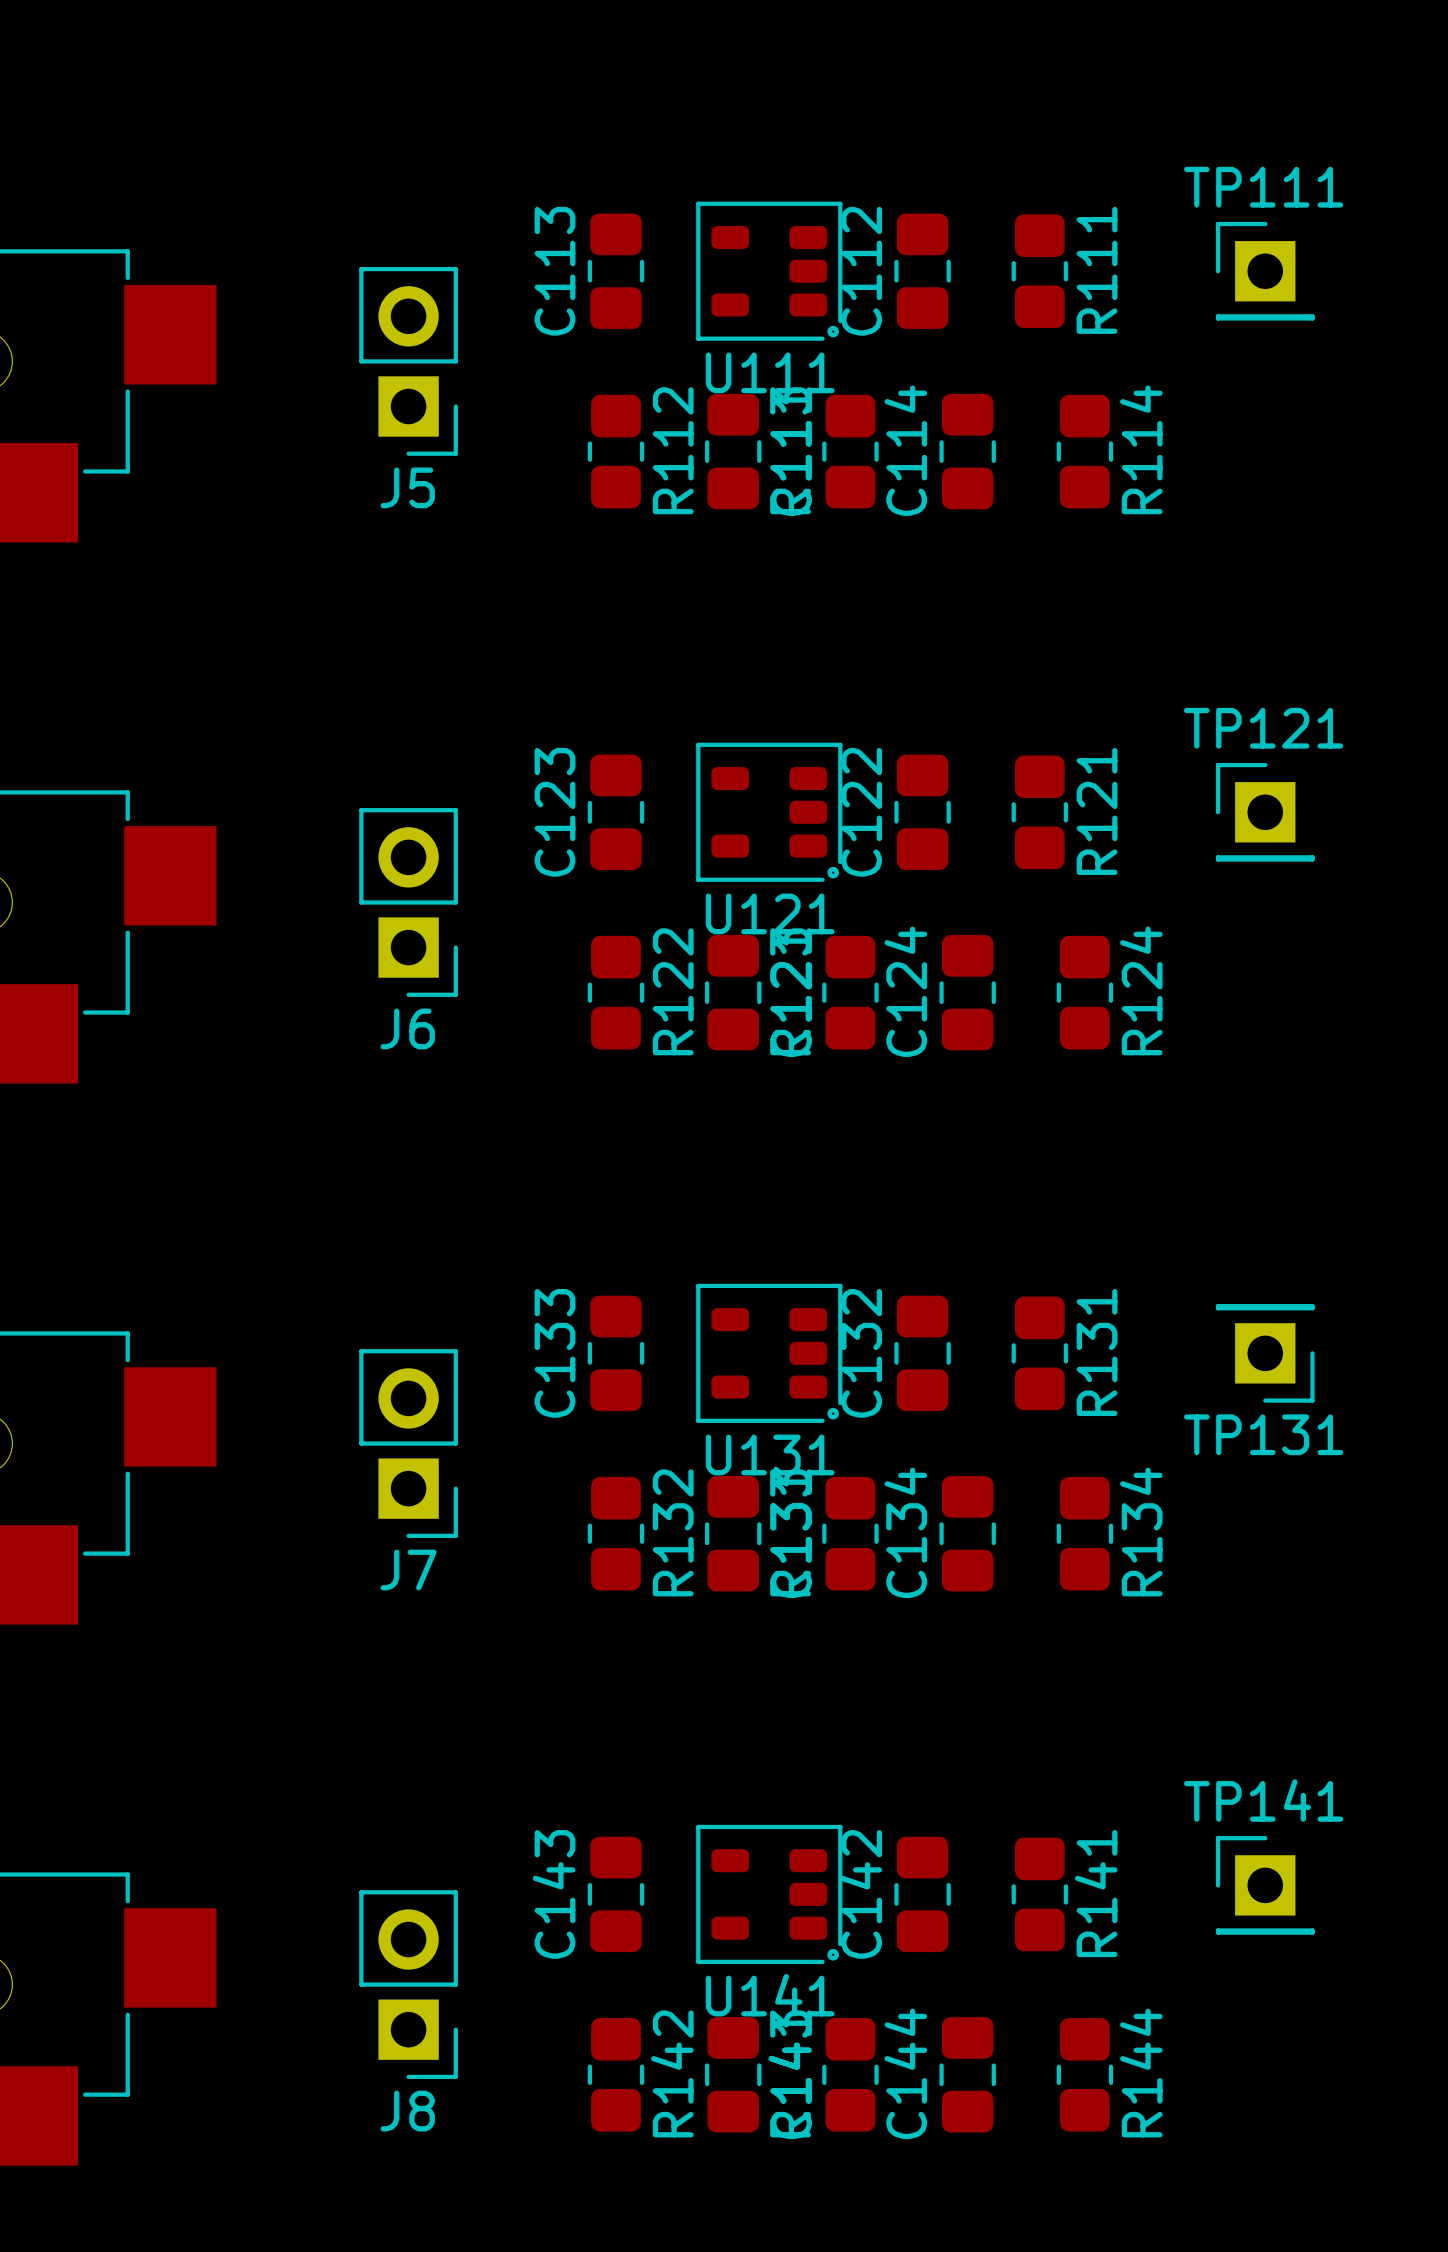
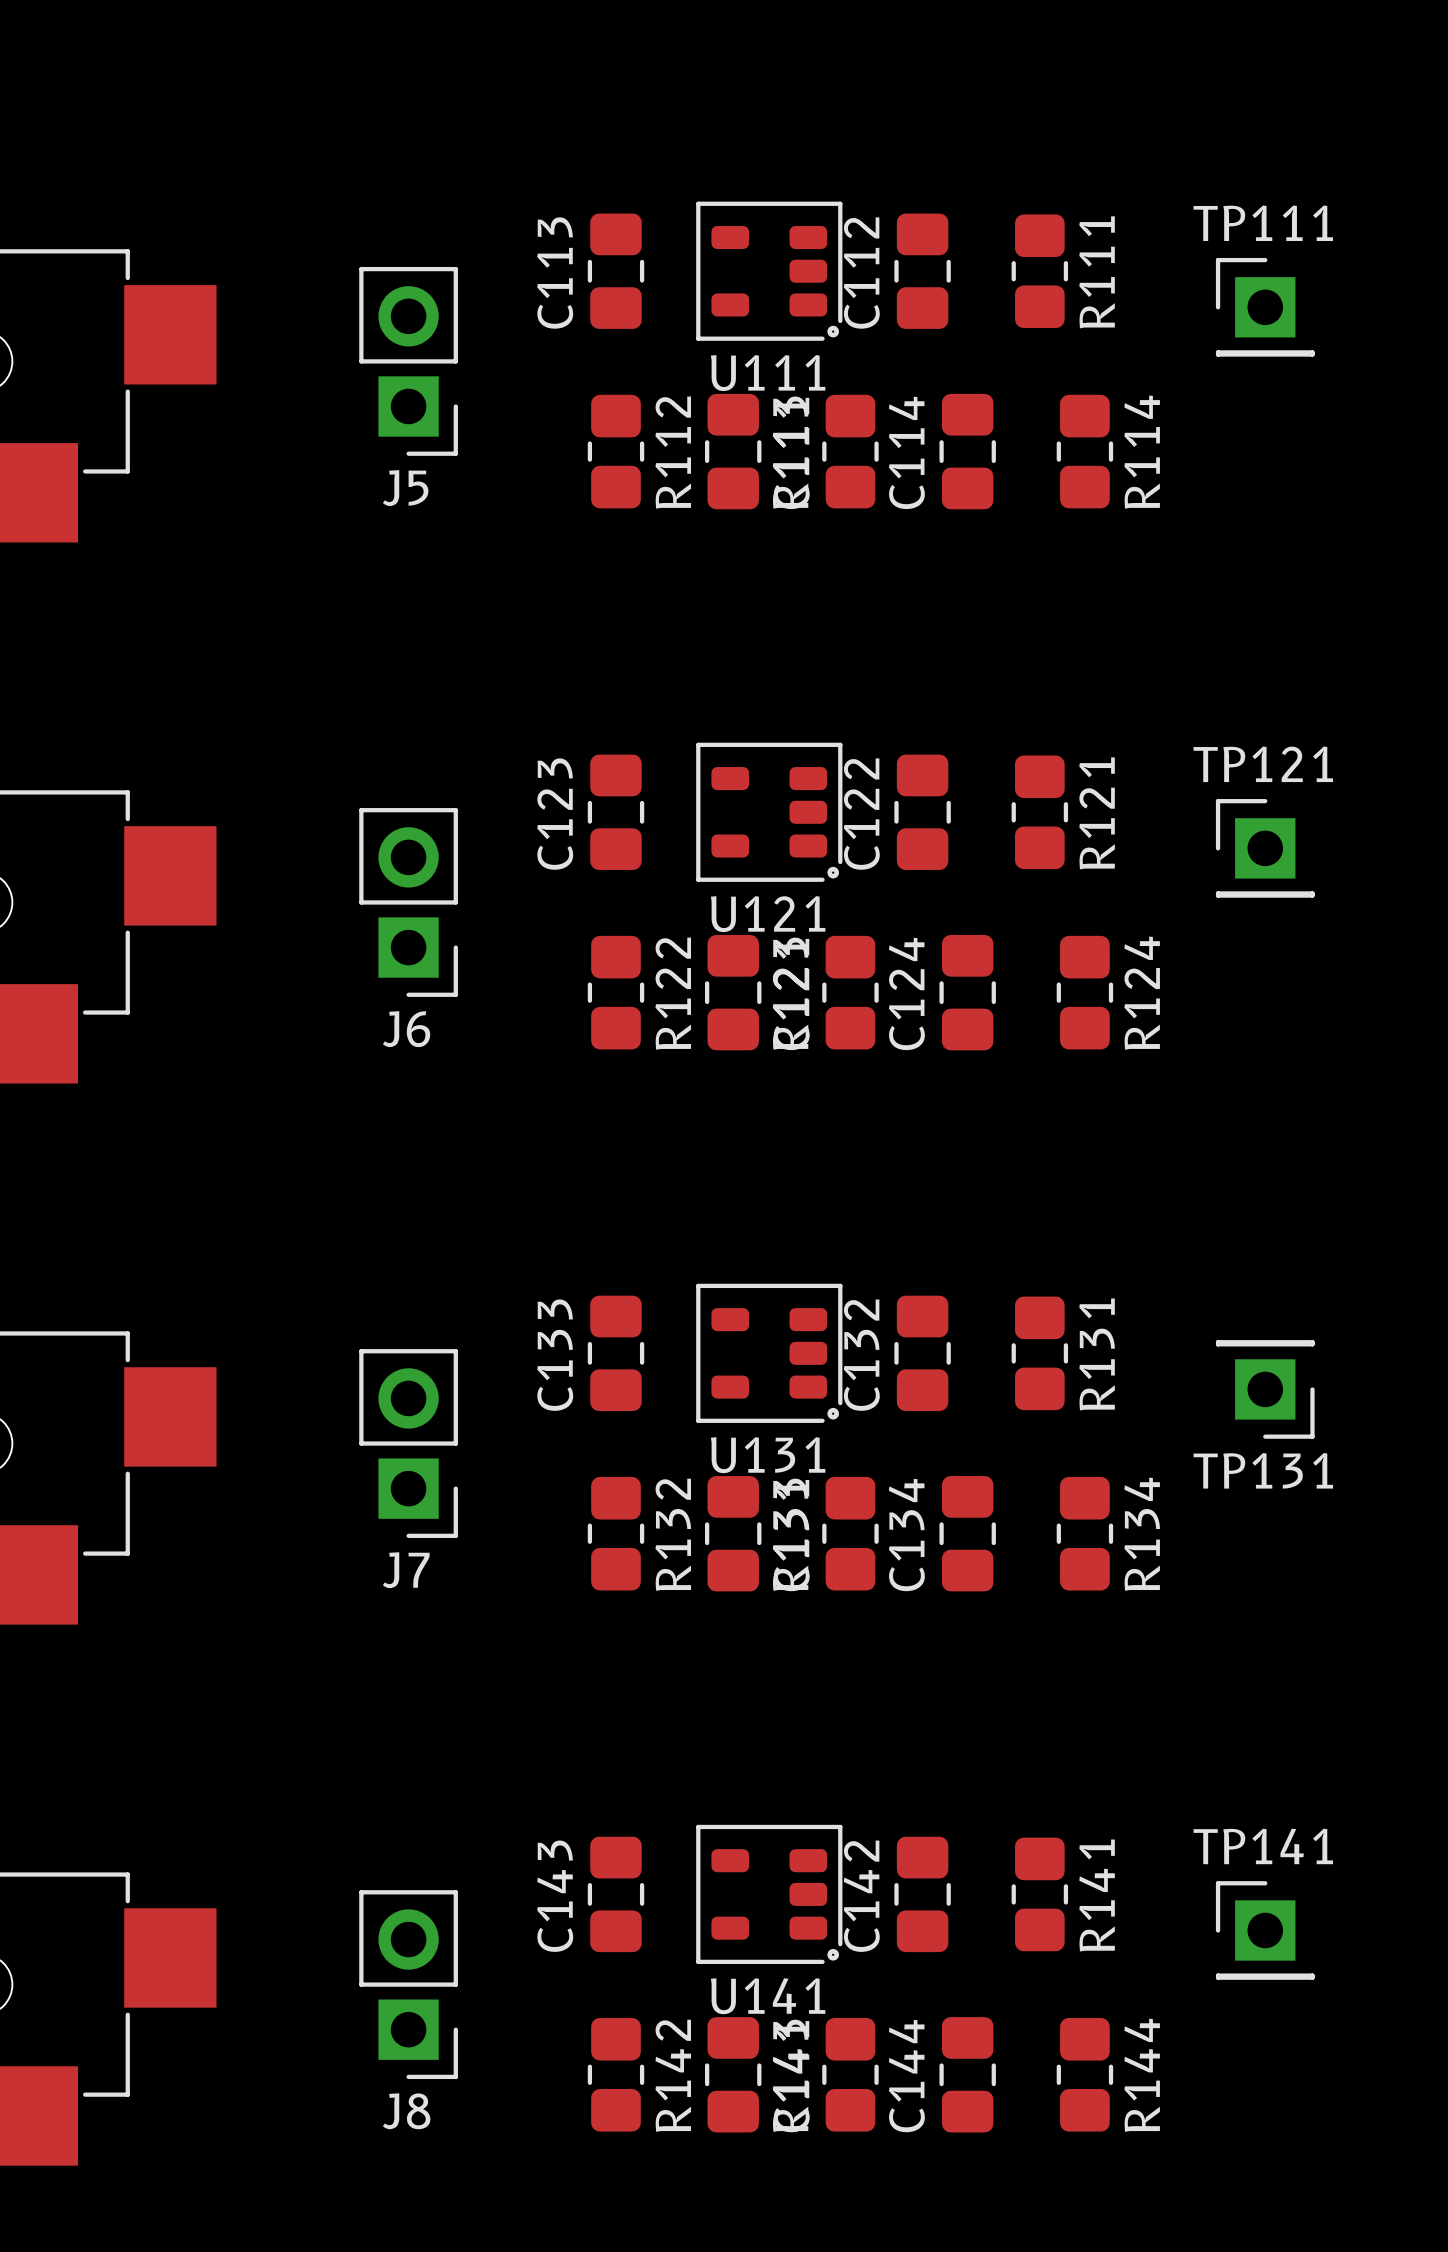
TP111 position: (1265, 271) -> (1265, 307)
TP121 position: (1265, 812) -> (1265, 848)
TP131 position: (1265, 1353) -> (1265, 1389)
TP141 position: (1265, 1885) -> (1265, 1930)

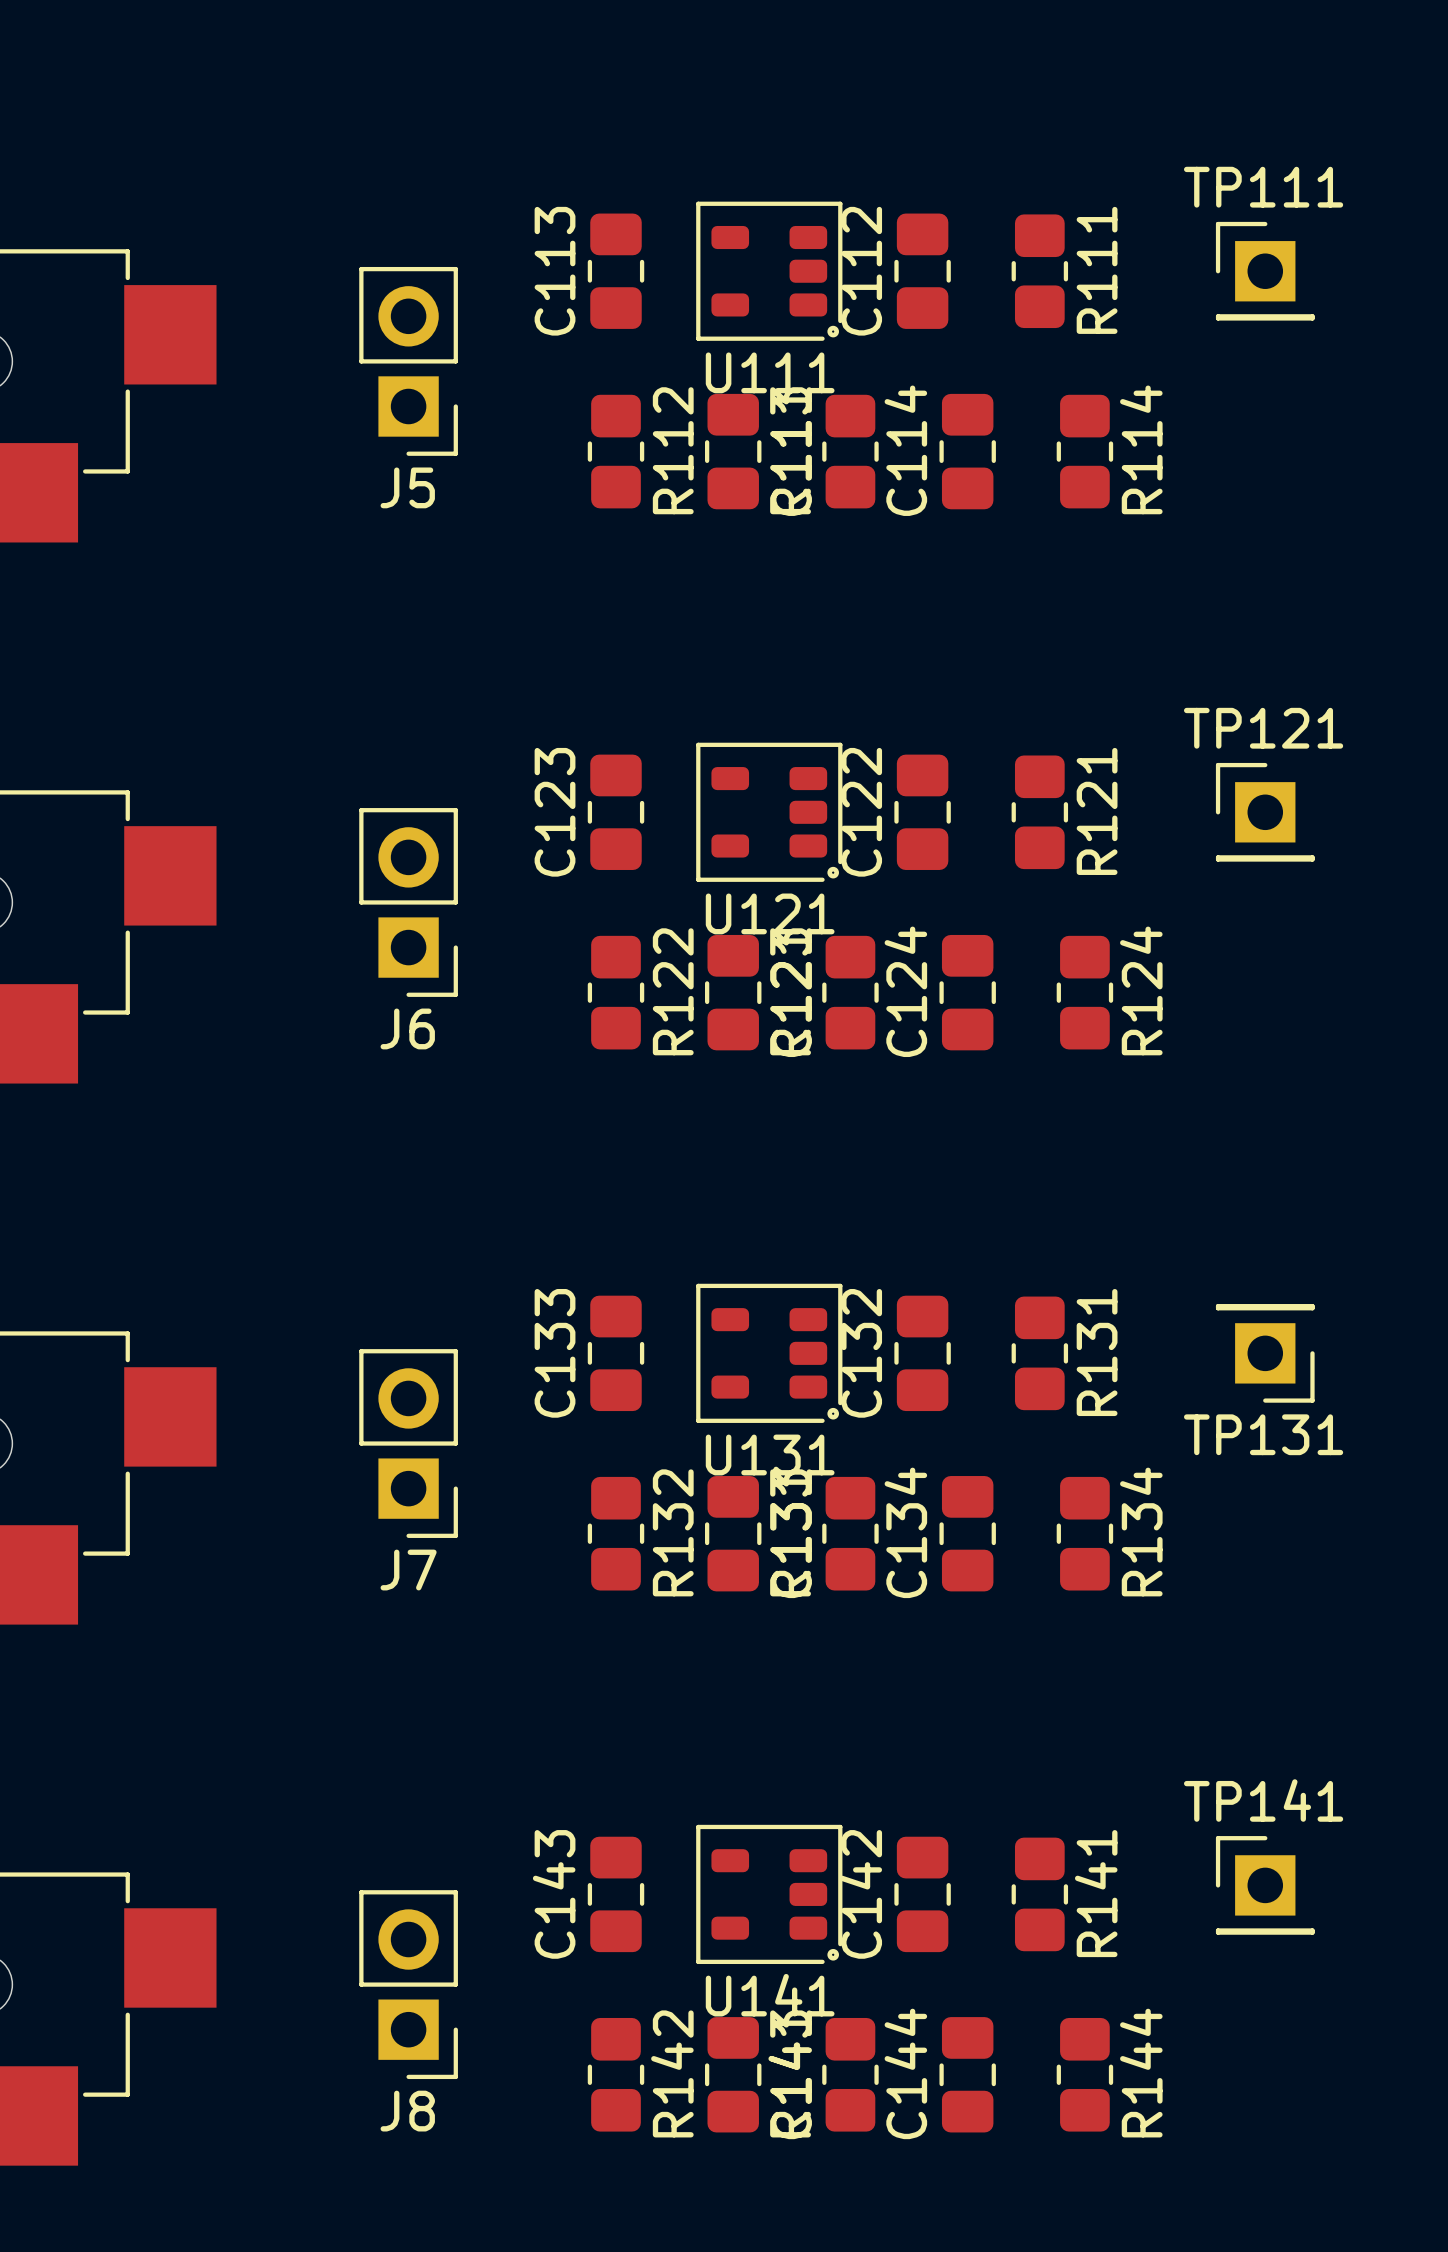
TP111 position: (1265, 307) -> (1265, 271)
TP121 position: (1265, 848) -> (1265, 812)
TP131 position: (1265, 1389) -> (1265, 1353)
TP141 position: (1265, 1930) -> (1265, 1885)

